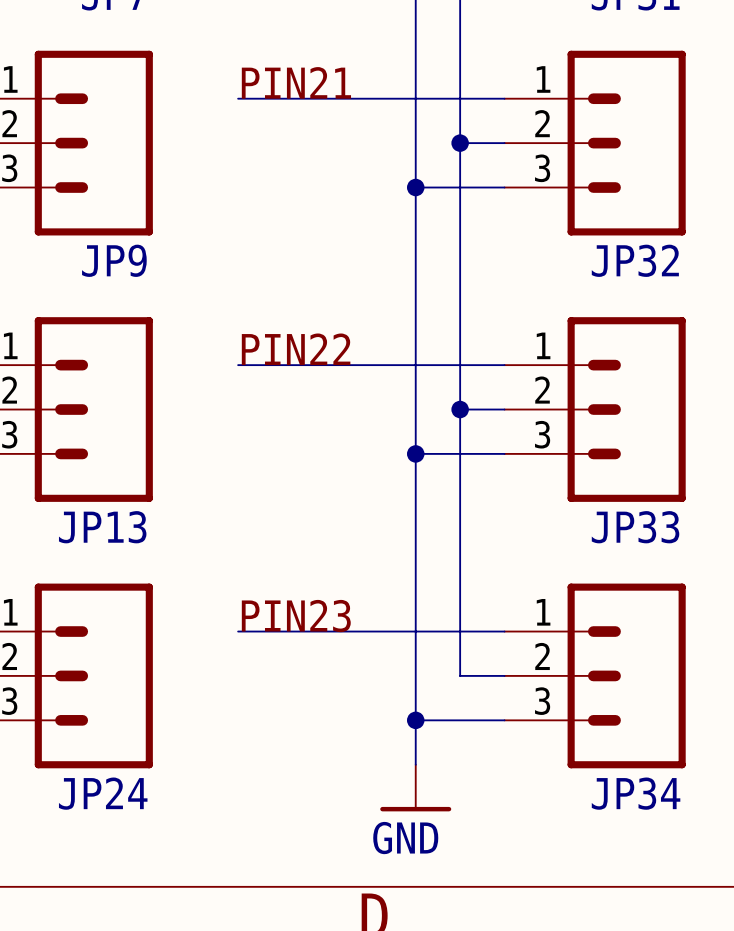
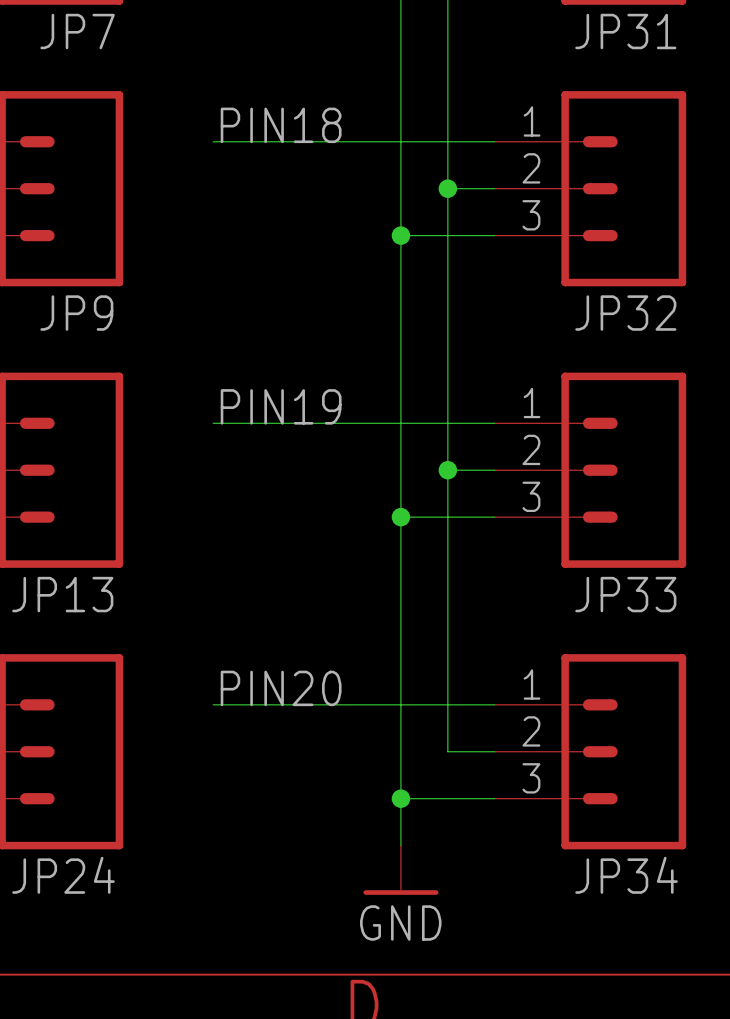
label: PIN21 (296, 82) -> PIN18 (281, 125)
label: PIN22 (296, 349) -> PIN19 (281, 406)
label: PIN23 (296, 616) -> PIN20 (281, 688)

